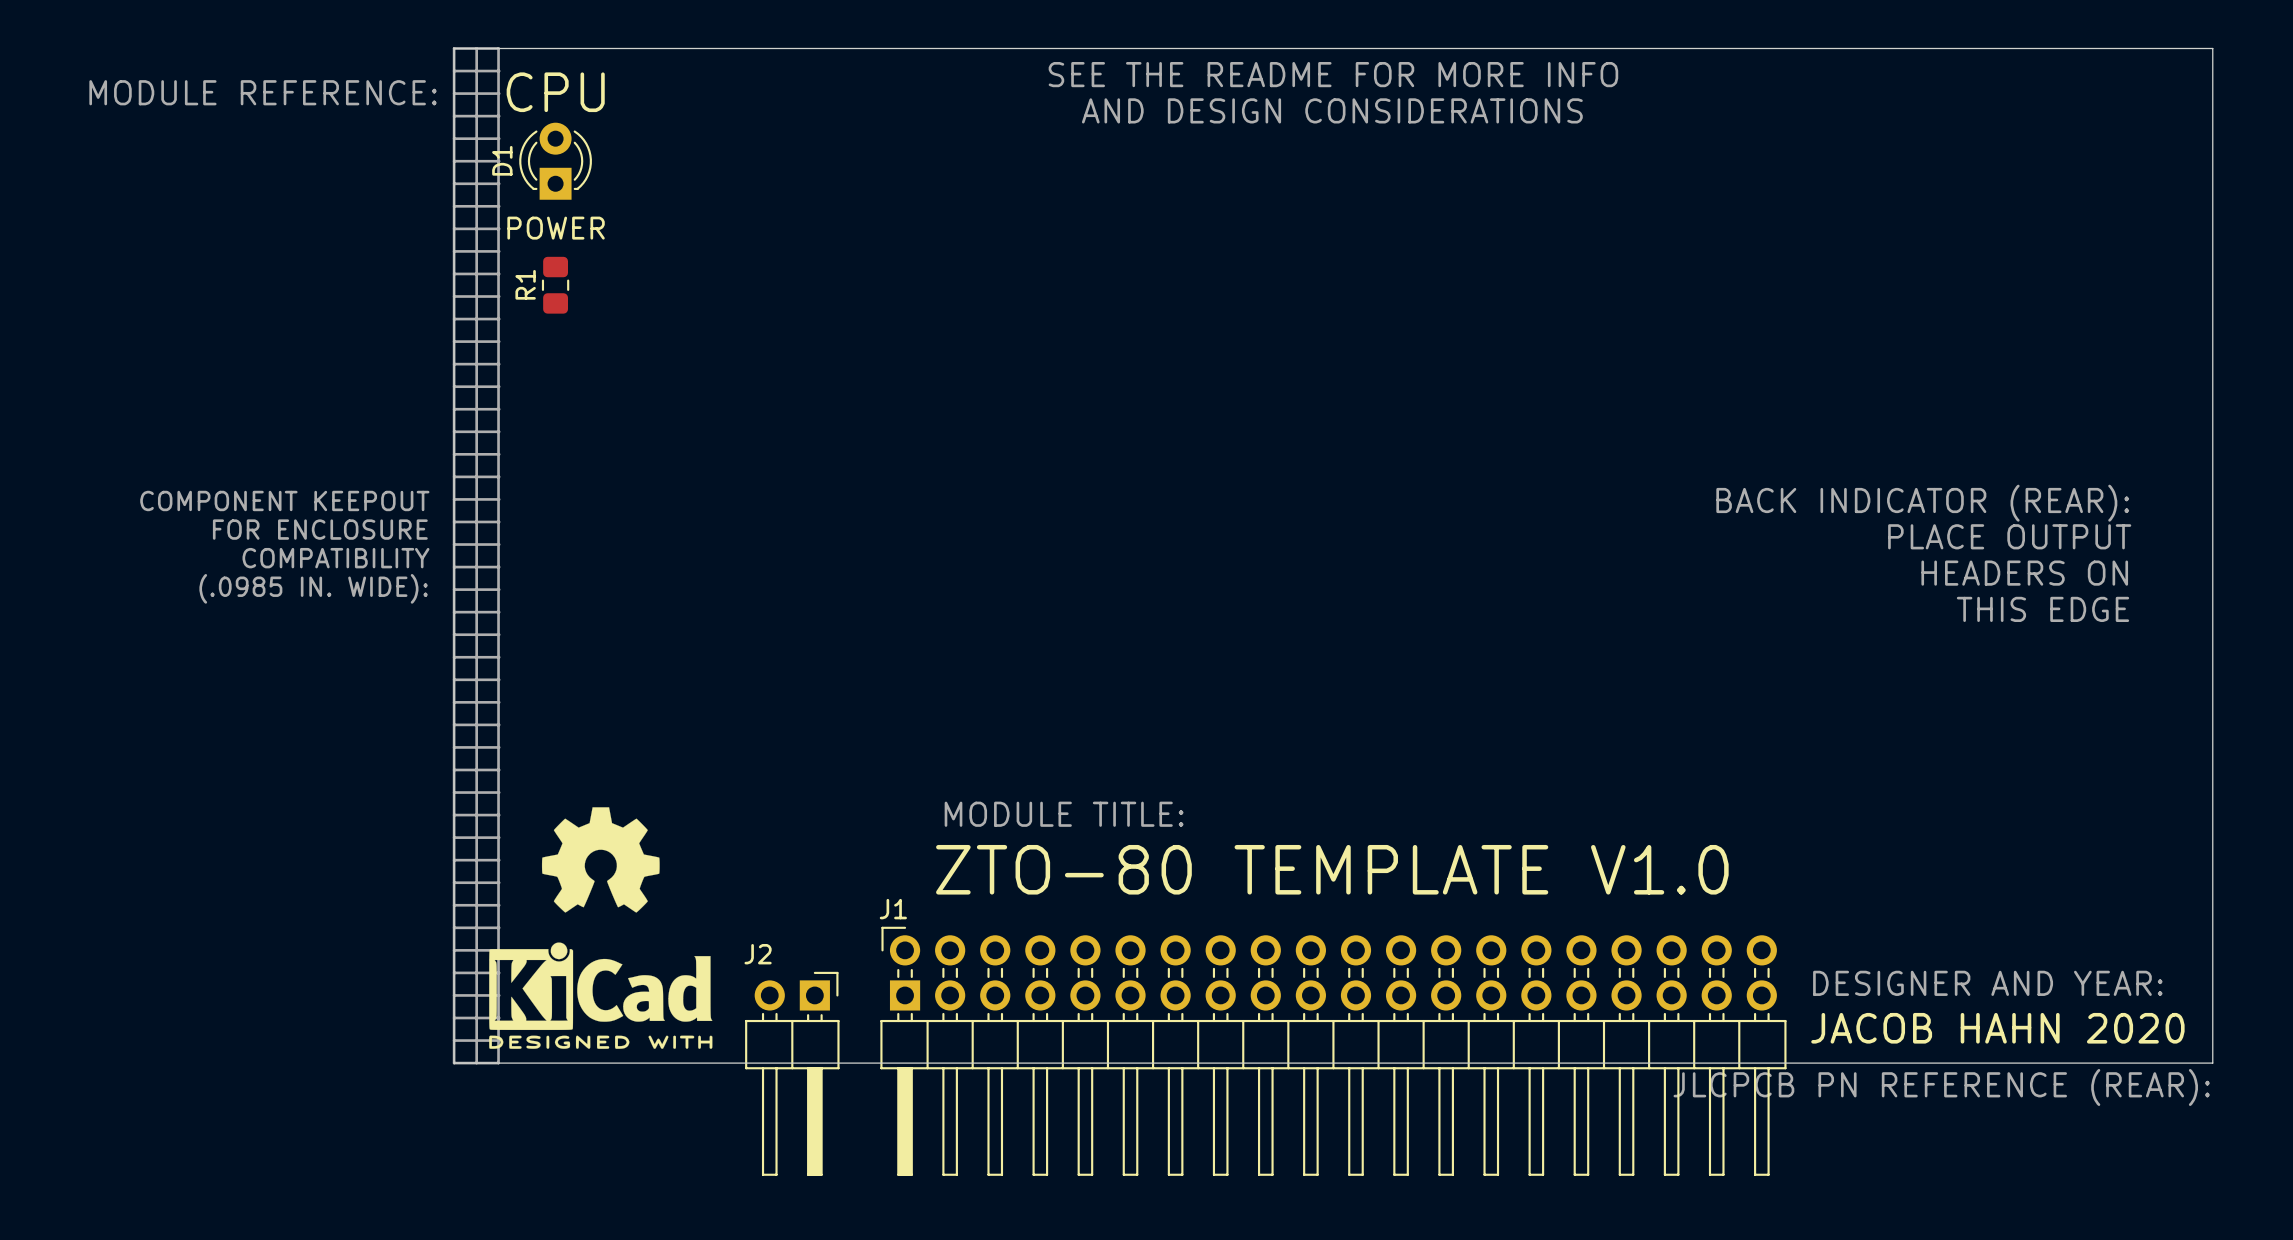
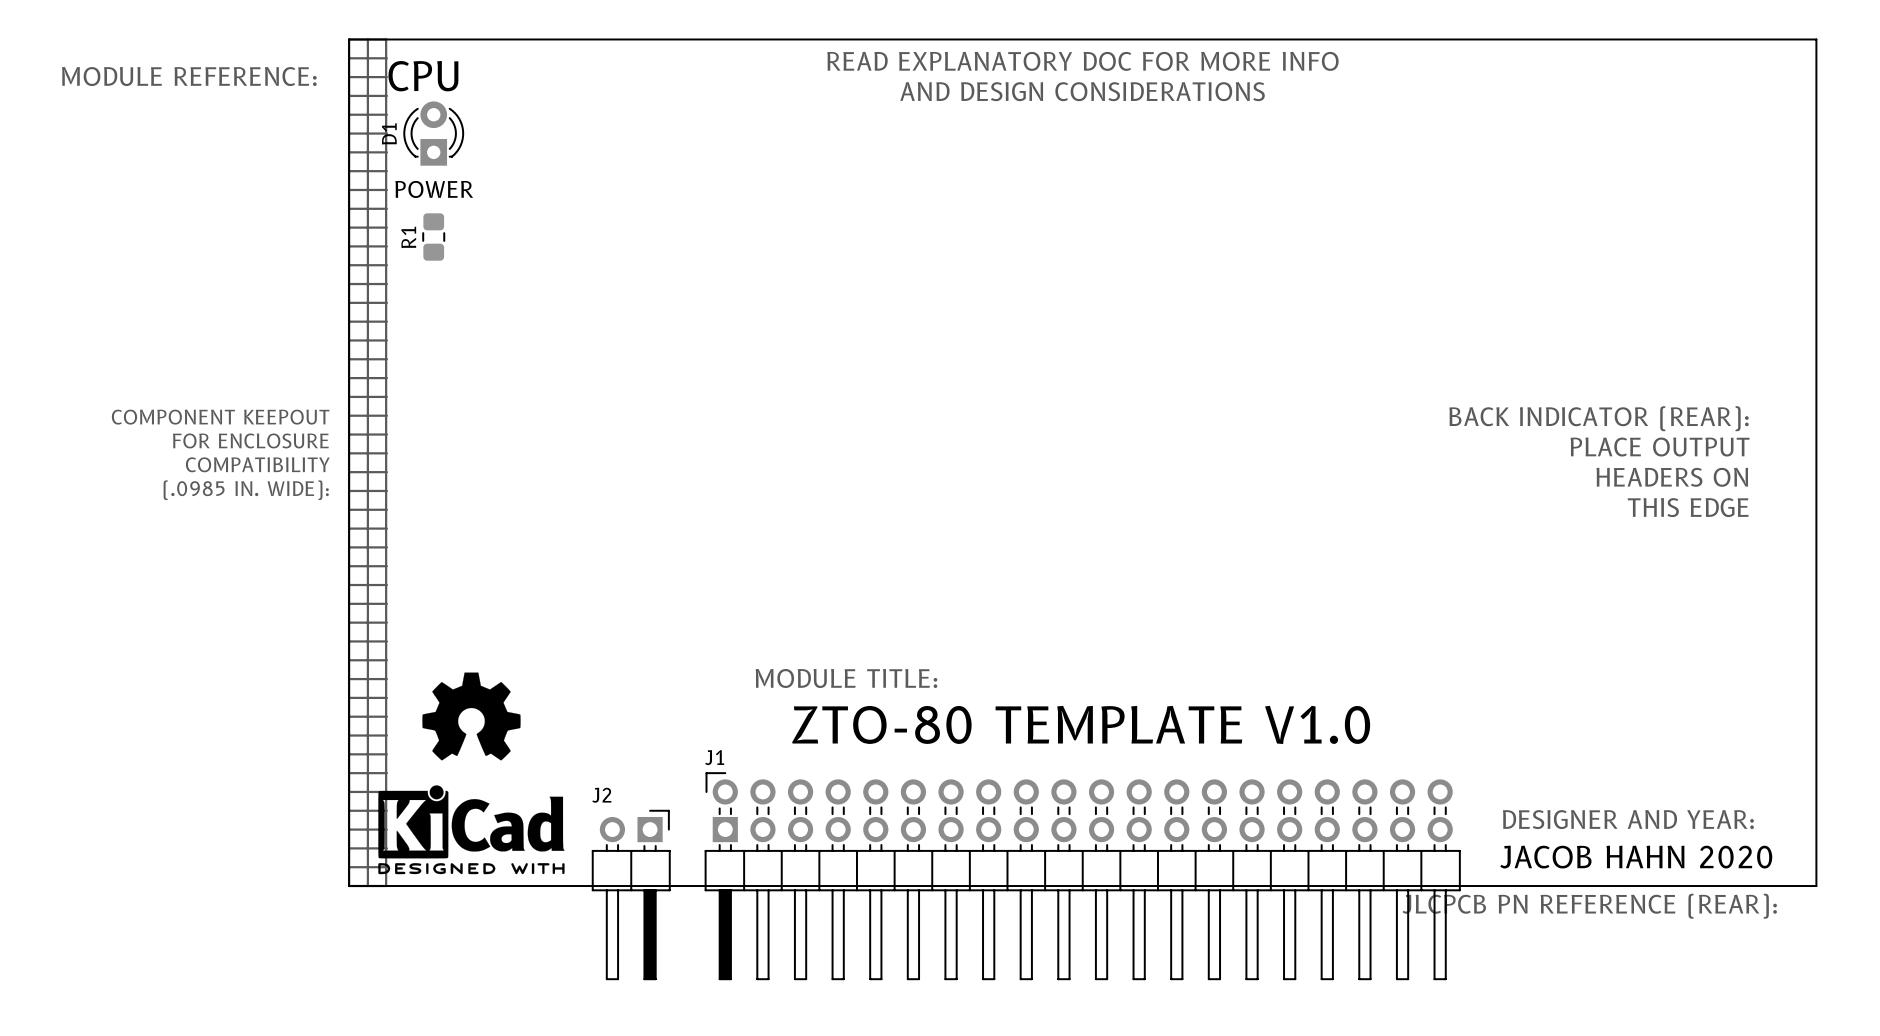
text: SEE THE README FOR MORE INFO (1333, 74) -> READ EXPLANATORY DOC FOR MORE INFO (1082, 61)

